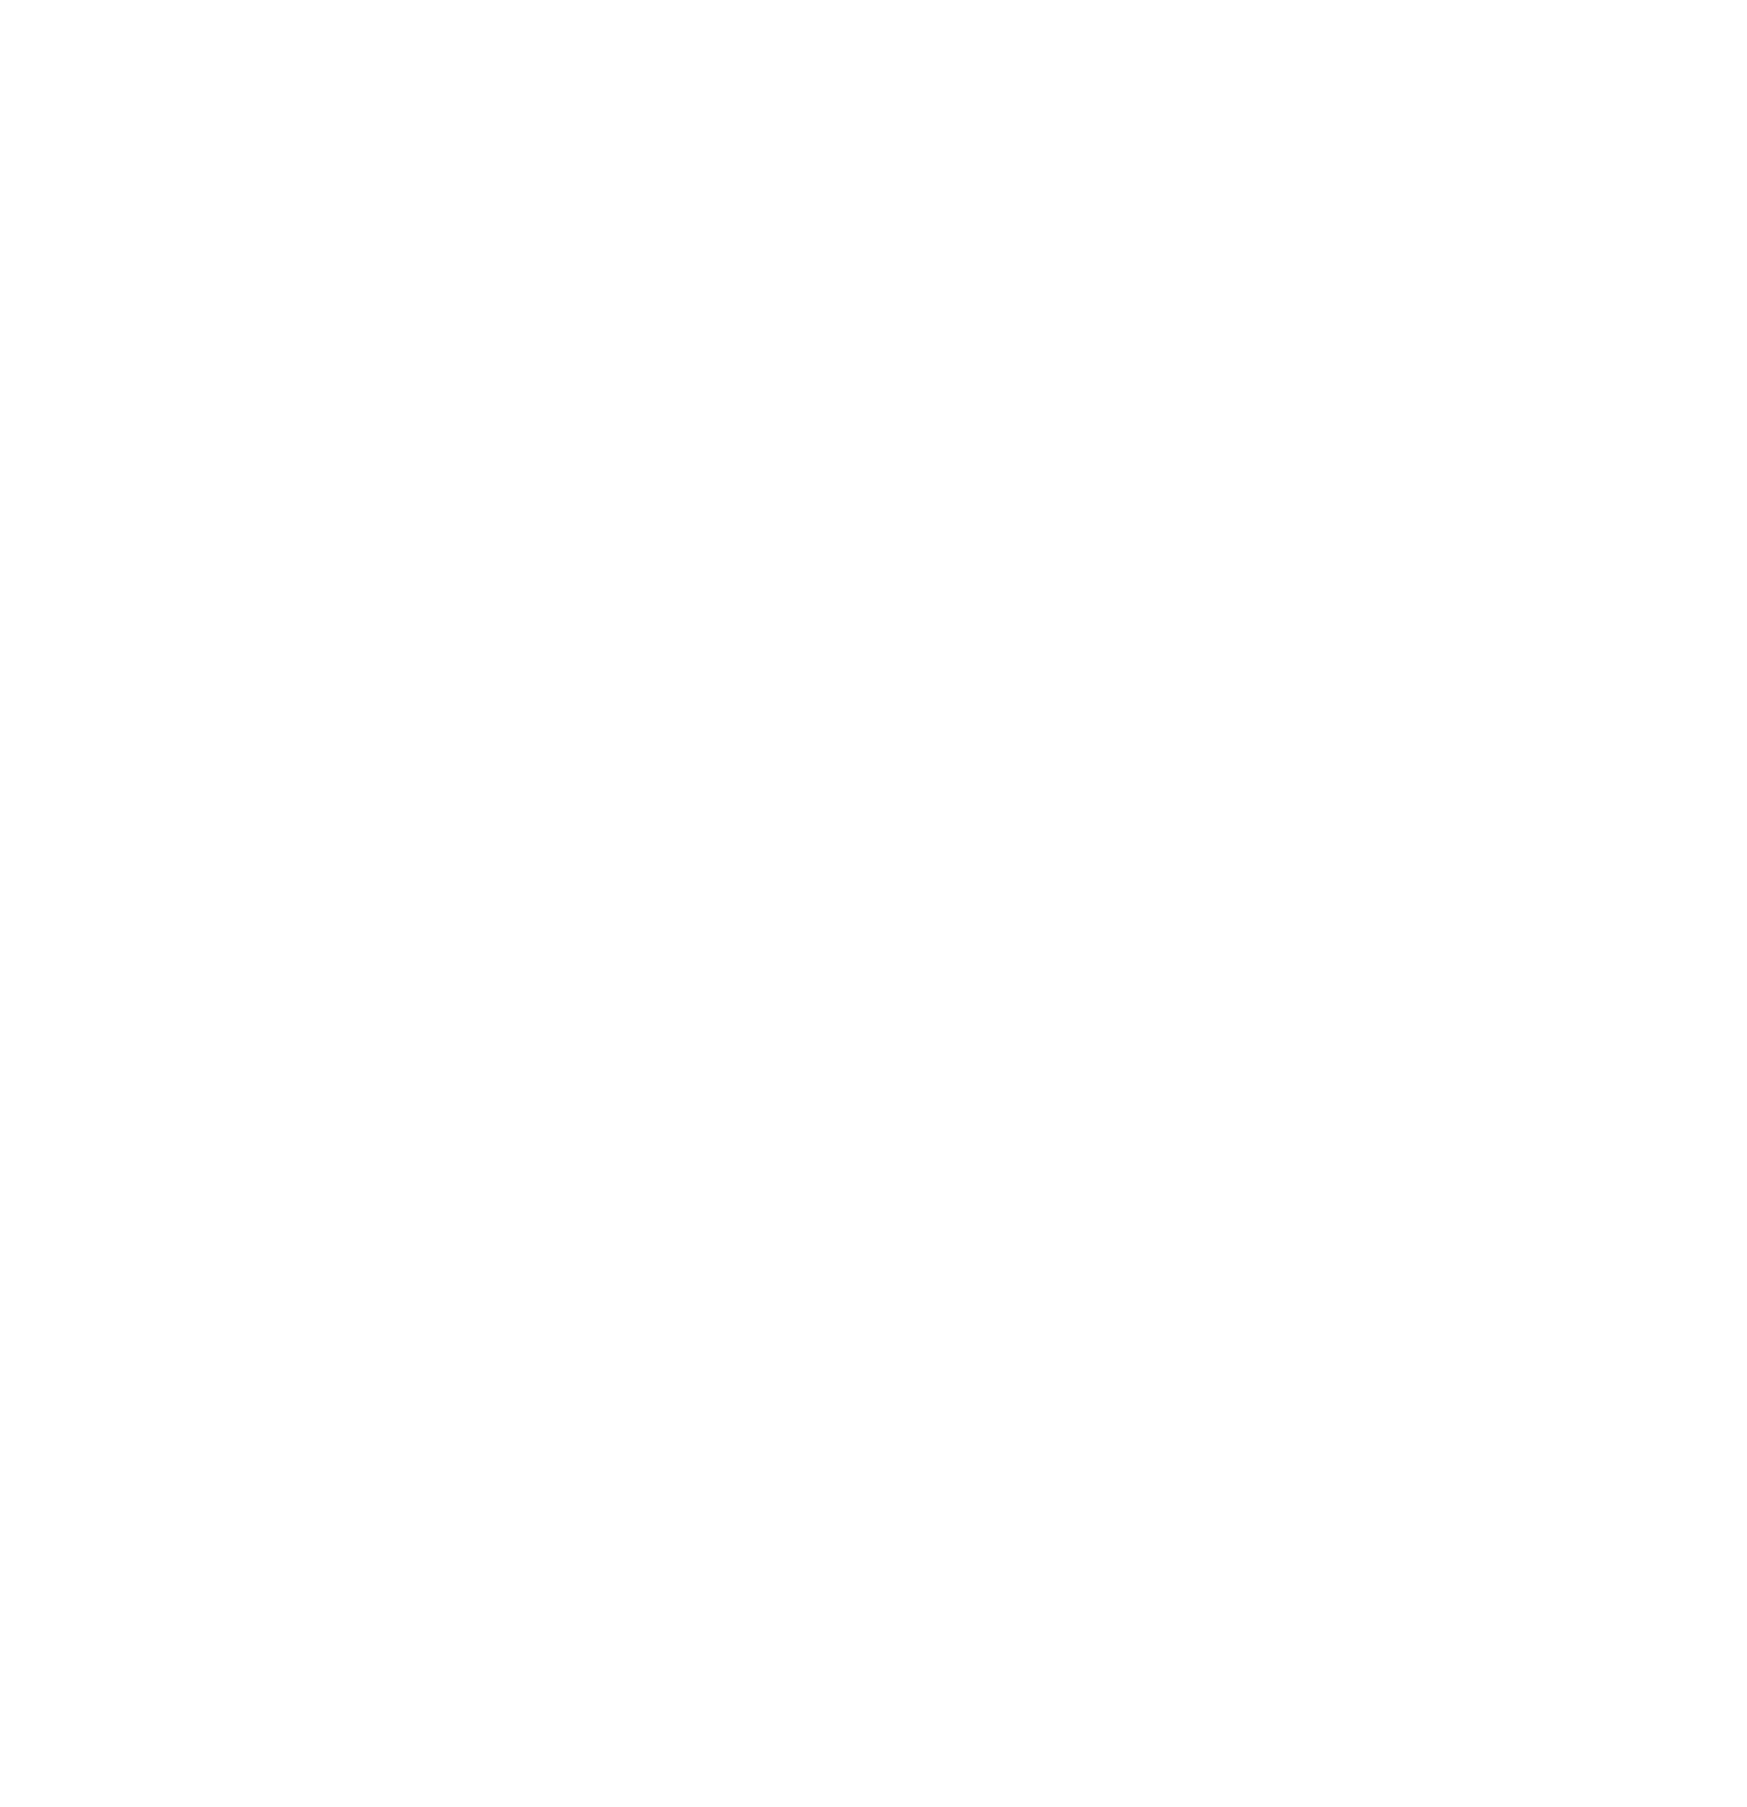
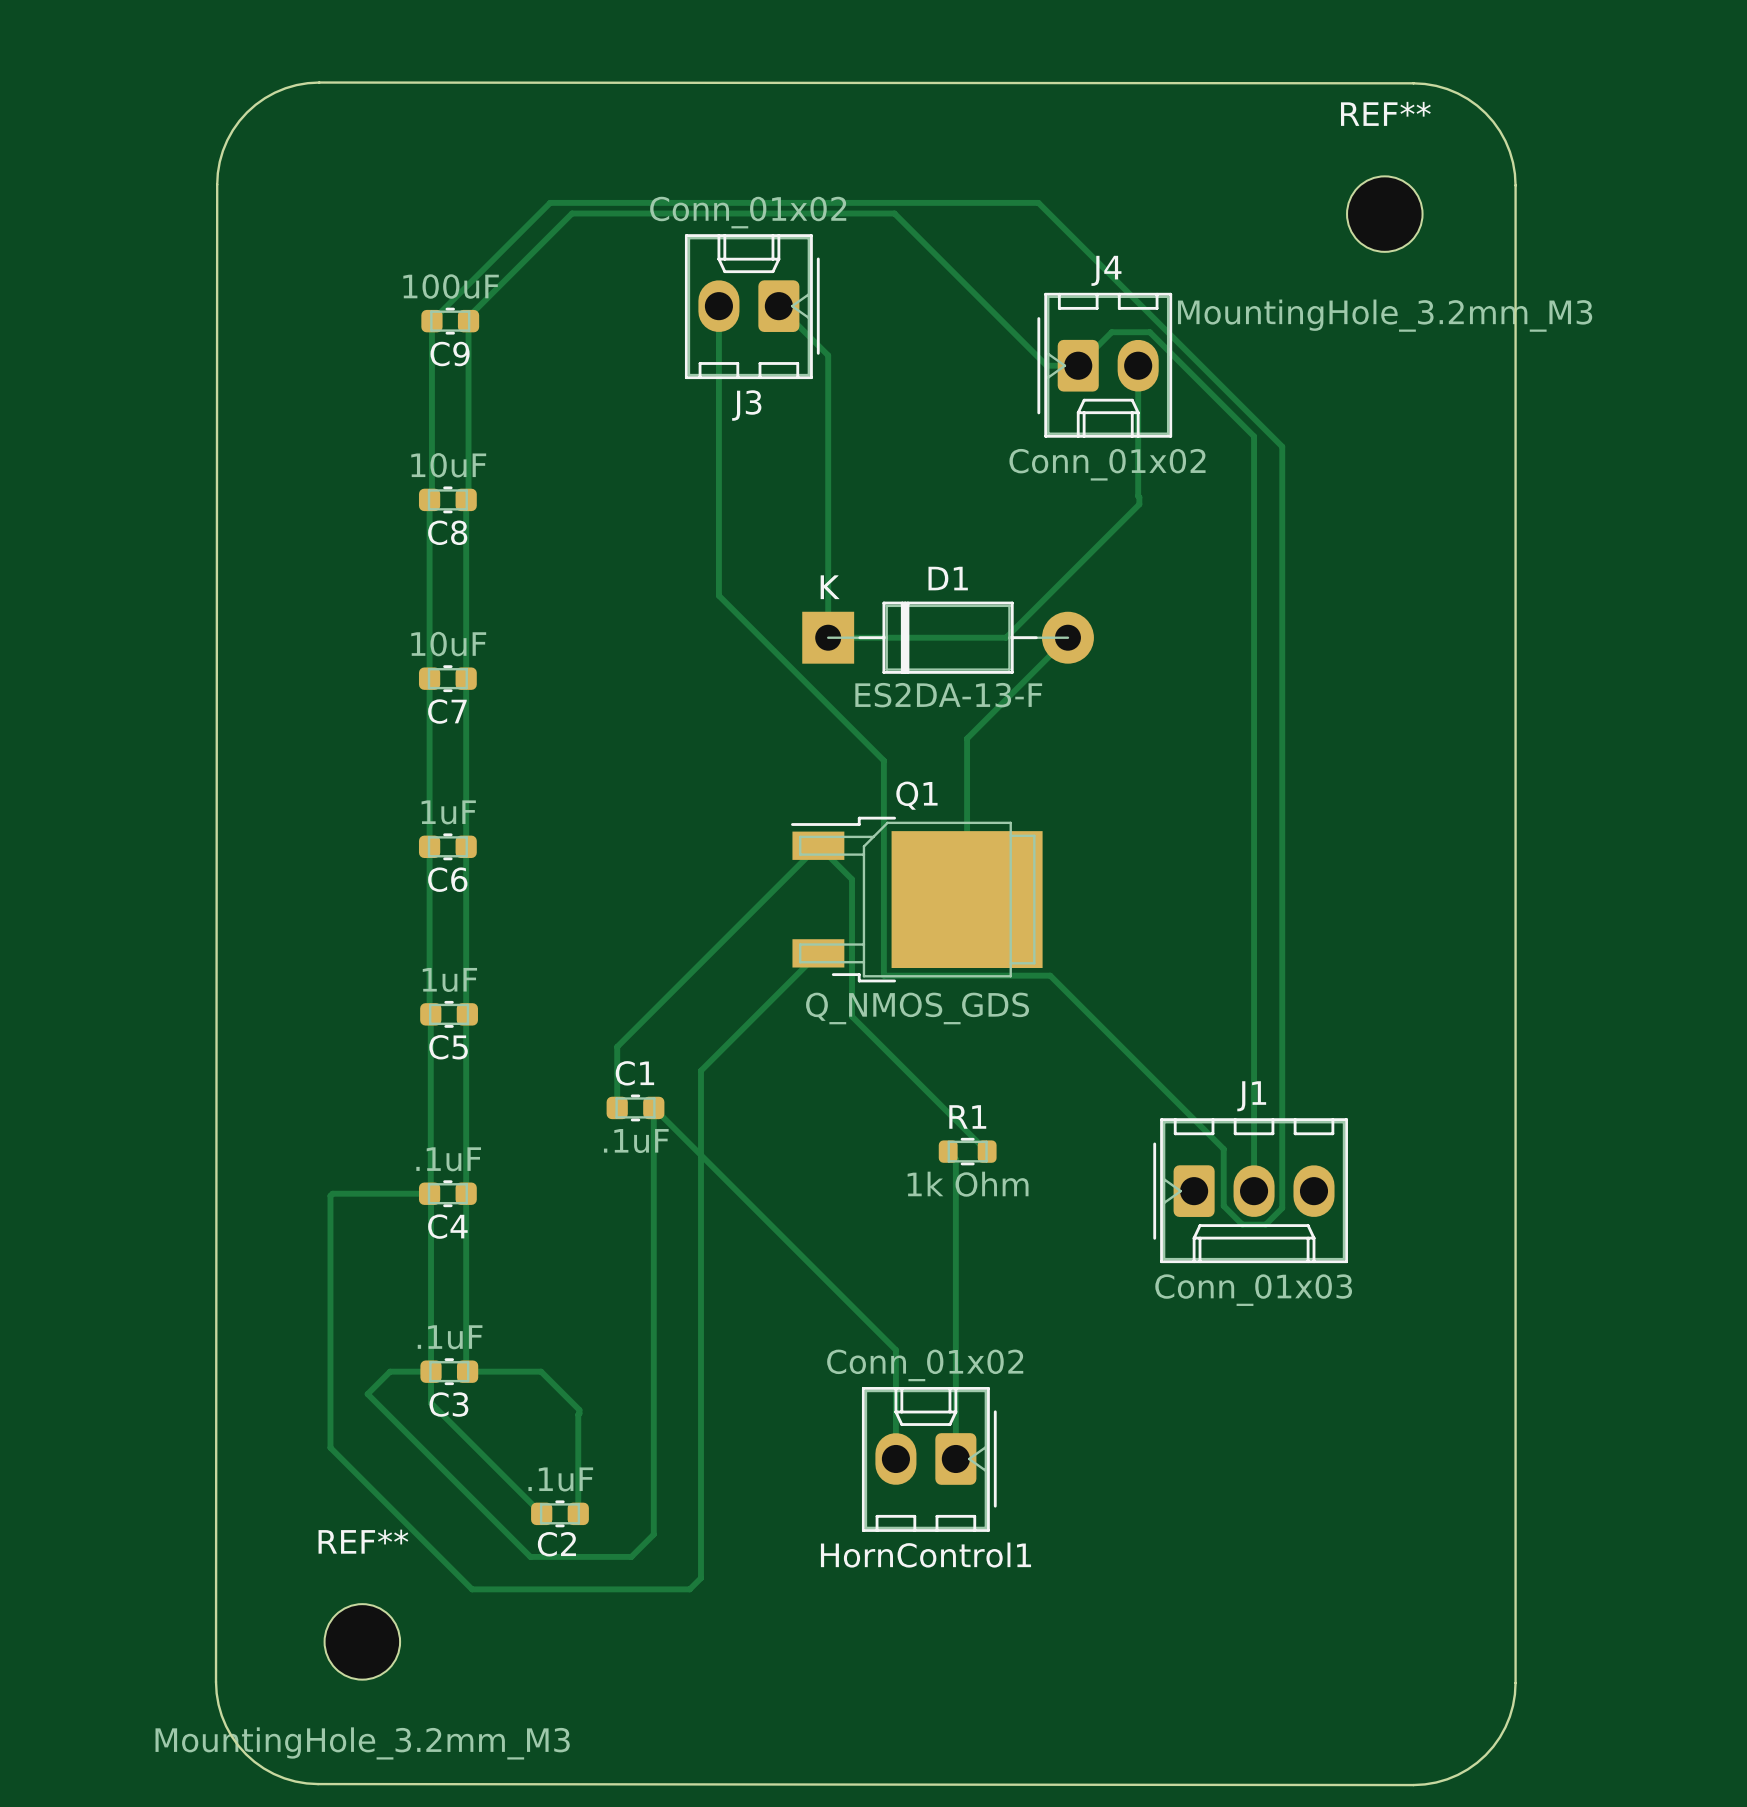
board edge: none -> (319, 82) (1413, 83) (1436, 85) (1457, 93) (1485, 113) (1499, 131) (1509, 151) (1515, 185) (1515, 1682) (1509, 1716) (1499, 1737) (1485, 1755) (1467, 1769) (1436, 1782) (1413, 1785) (318, 1784) (295, 1781) (263, 1768) (245, 1754) (231, 1736) (221, 1715) (216, 1682) (217, 184) (219, 161) (227, 140) (247, 112) (274, 92) (296, 85) (319, 82)
REF**: none -> MountingHole_3.2mm_M3 (1384, 214)
track: none -> (715, 302) (718, 306) (718, 595) (883, 760) (883, 975) (1050, 975) (1223, 1149) (1223, 1206) (1242, 1224) (1265, 1224) (1282, 1208) (1282, 446) (1038, 202) (550, 202) (431, 321) (431, 497) (429, 499) (429, 1193)
J3: none -> Conn_01x02 (752, 306)
track: none -> (778, 306) (828, 355) (828, 637) (1006, 637) (1139, 504) (1138, 365)
C9: none -> 100uF (450, 321)
J4: none -> Conn_01x02 (1104, 365)
C8: none -> 10uF (447, 499)
D1: none -> ES2DA-13-F (948, 637)
track: none -> (1067, 637) (967, 738) (967, 899)
C7: none -> 10uF (447, 678)
C6: none -> 1uF (447, 846)
Q1: none -> Q_NMOS_GDS (916, 899)
track: none -> (818, 953) (700, 1070) (700, 1578) (689, 1589) (472, 1589) (330, 1447) (330, 1195) (332, 1193) (429, 1193)
C5: none -> 1uF (449, 1014)
track: none -> (617, 1107) (617, 1046) (818, 845) (852, 879) (852, 1016) (987, 1151)
C1: none -> .1uF (635, 1107)
track: none -> (948, 1151) (955, 1159) (955, 1458)
R1: none -> 1k Ohm (967, 1151)
J1: none -> Conn_01x03 (1250, 1190)
track: none -> (1254, 1191) (1254, 436) (1149, 332) (1111, 332) (1078, 365) (1046, 365) (894, 213) (572, 213) (468, 317) (468, 497) (466, 499) (466, 1370) (541, 1371) (579, 1410) (578, 1513)
track: none -> (429, 1193) (431, 1403) (541, 1513)
C4: none -> .1uF (447, 1193)
track: none -> (431, 1371) (390, 1371) (367, 1394) (530, 1556) (631, 1556) (653, 1534) (653, 1107) (895, 1350) (895, 1458)
C3: none -> .1uF (449, 1371)
HornControl1: none -> Conn_01x02 (929, 1459)
C2: none -> .1uF (559, 1513)
REF**: none -> MountingHole_3.2mm_M3 (362, 1641)

